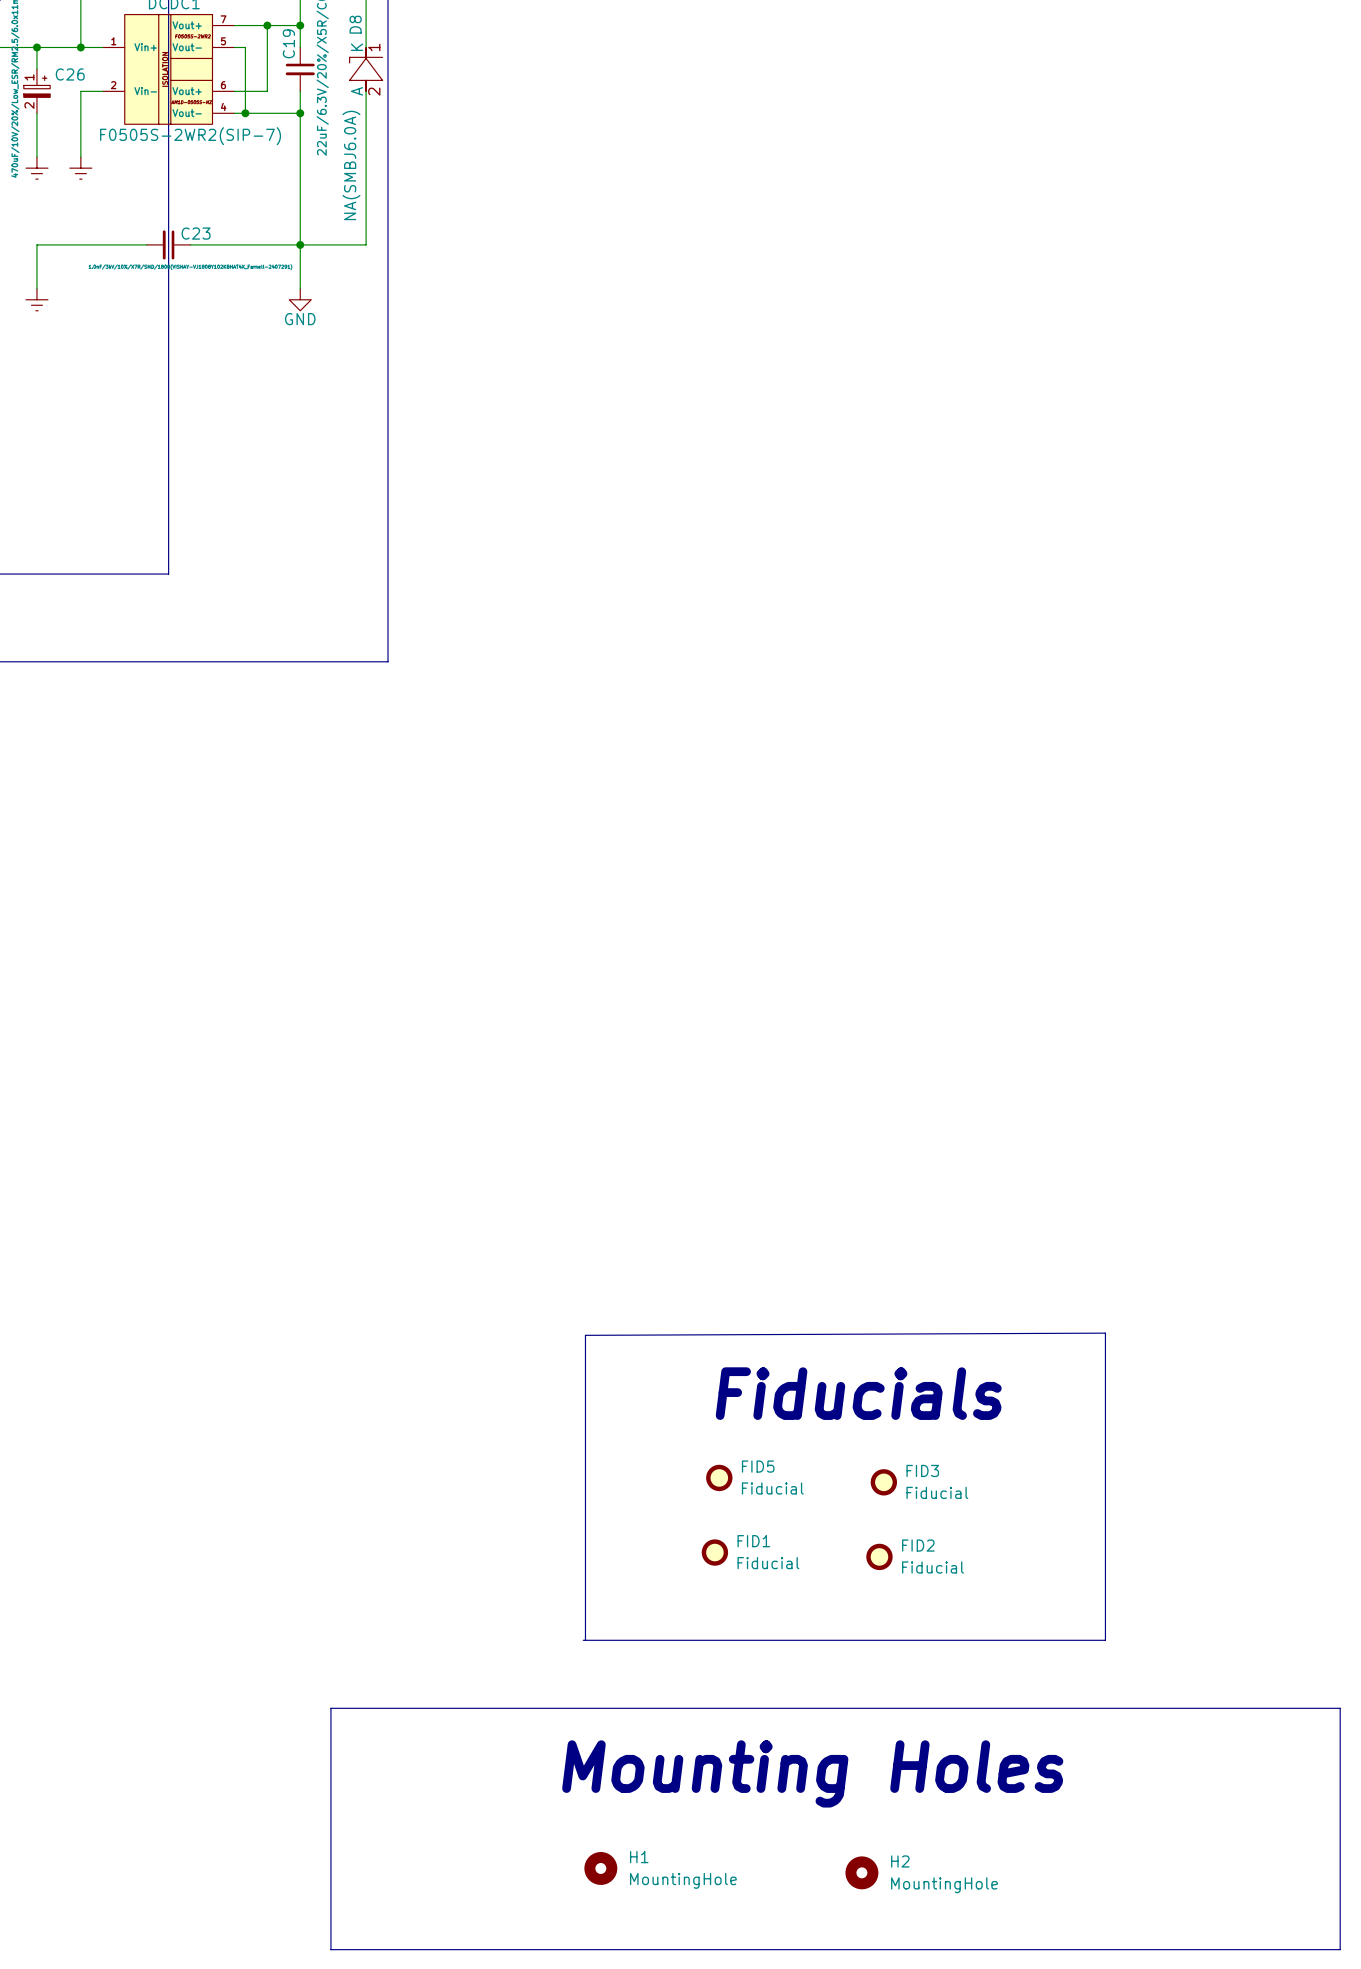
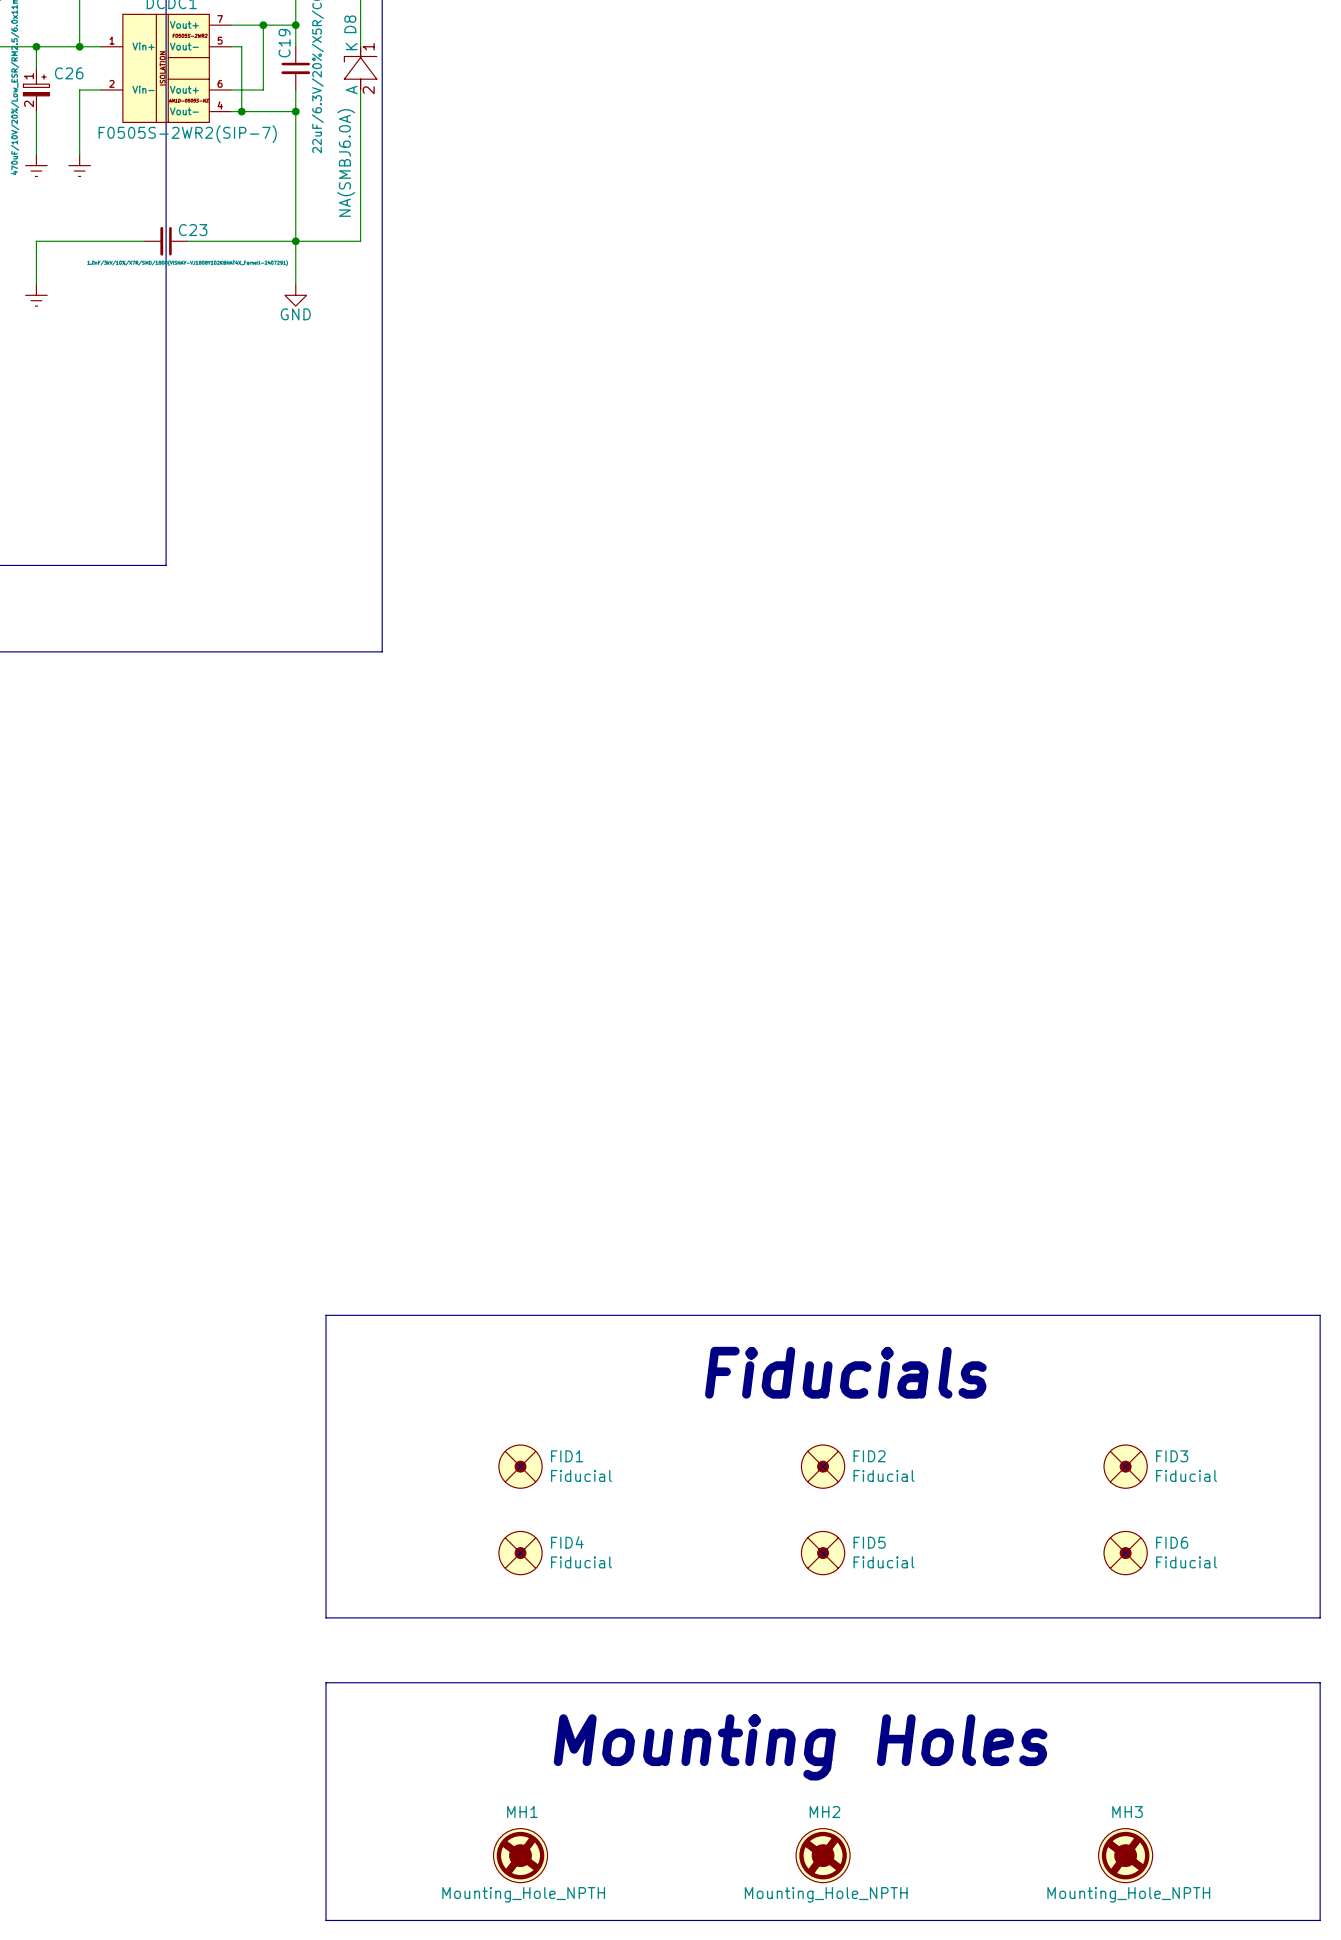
line: none -> (326, 1315) (1320, 1315) (1320, 1617) (326, 1617) (326, 1315)
FID5 symbol: [706, 1464, 733, 1492] -> [801, 1531, 845, 1575]
FID3 symbol: [870, 1469, 898, 1496] -> [1104, 1445, 1148, 1489]
FID1 symbol: [701, 1539, 729, 1566] -> [498, 1445, 543, 1489]
FID2 symbol: [866, 1543, 893, 1571] -> [801, 1445, 845, 1489]
FID4: none -> Fiducial (520, 1553)
FID6: none -> Fiducial (1125, 1553)
line: (583, 1640) (1105, 1640) (1105, 1333) (585, 1335) (585, 1640) -> none
H1: MountingHole (600, 1868) -> none
H2: MountingHole (861, 1872) -> none
MH1: none -> Mounting_Hole_NPTH (520, 1855)
MH2: none -> Mounting_Hole_NPTH (823, 1855)
MH3: none -> Mounting_Hole_NPTH (1125, 1855)

